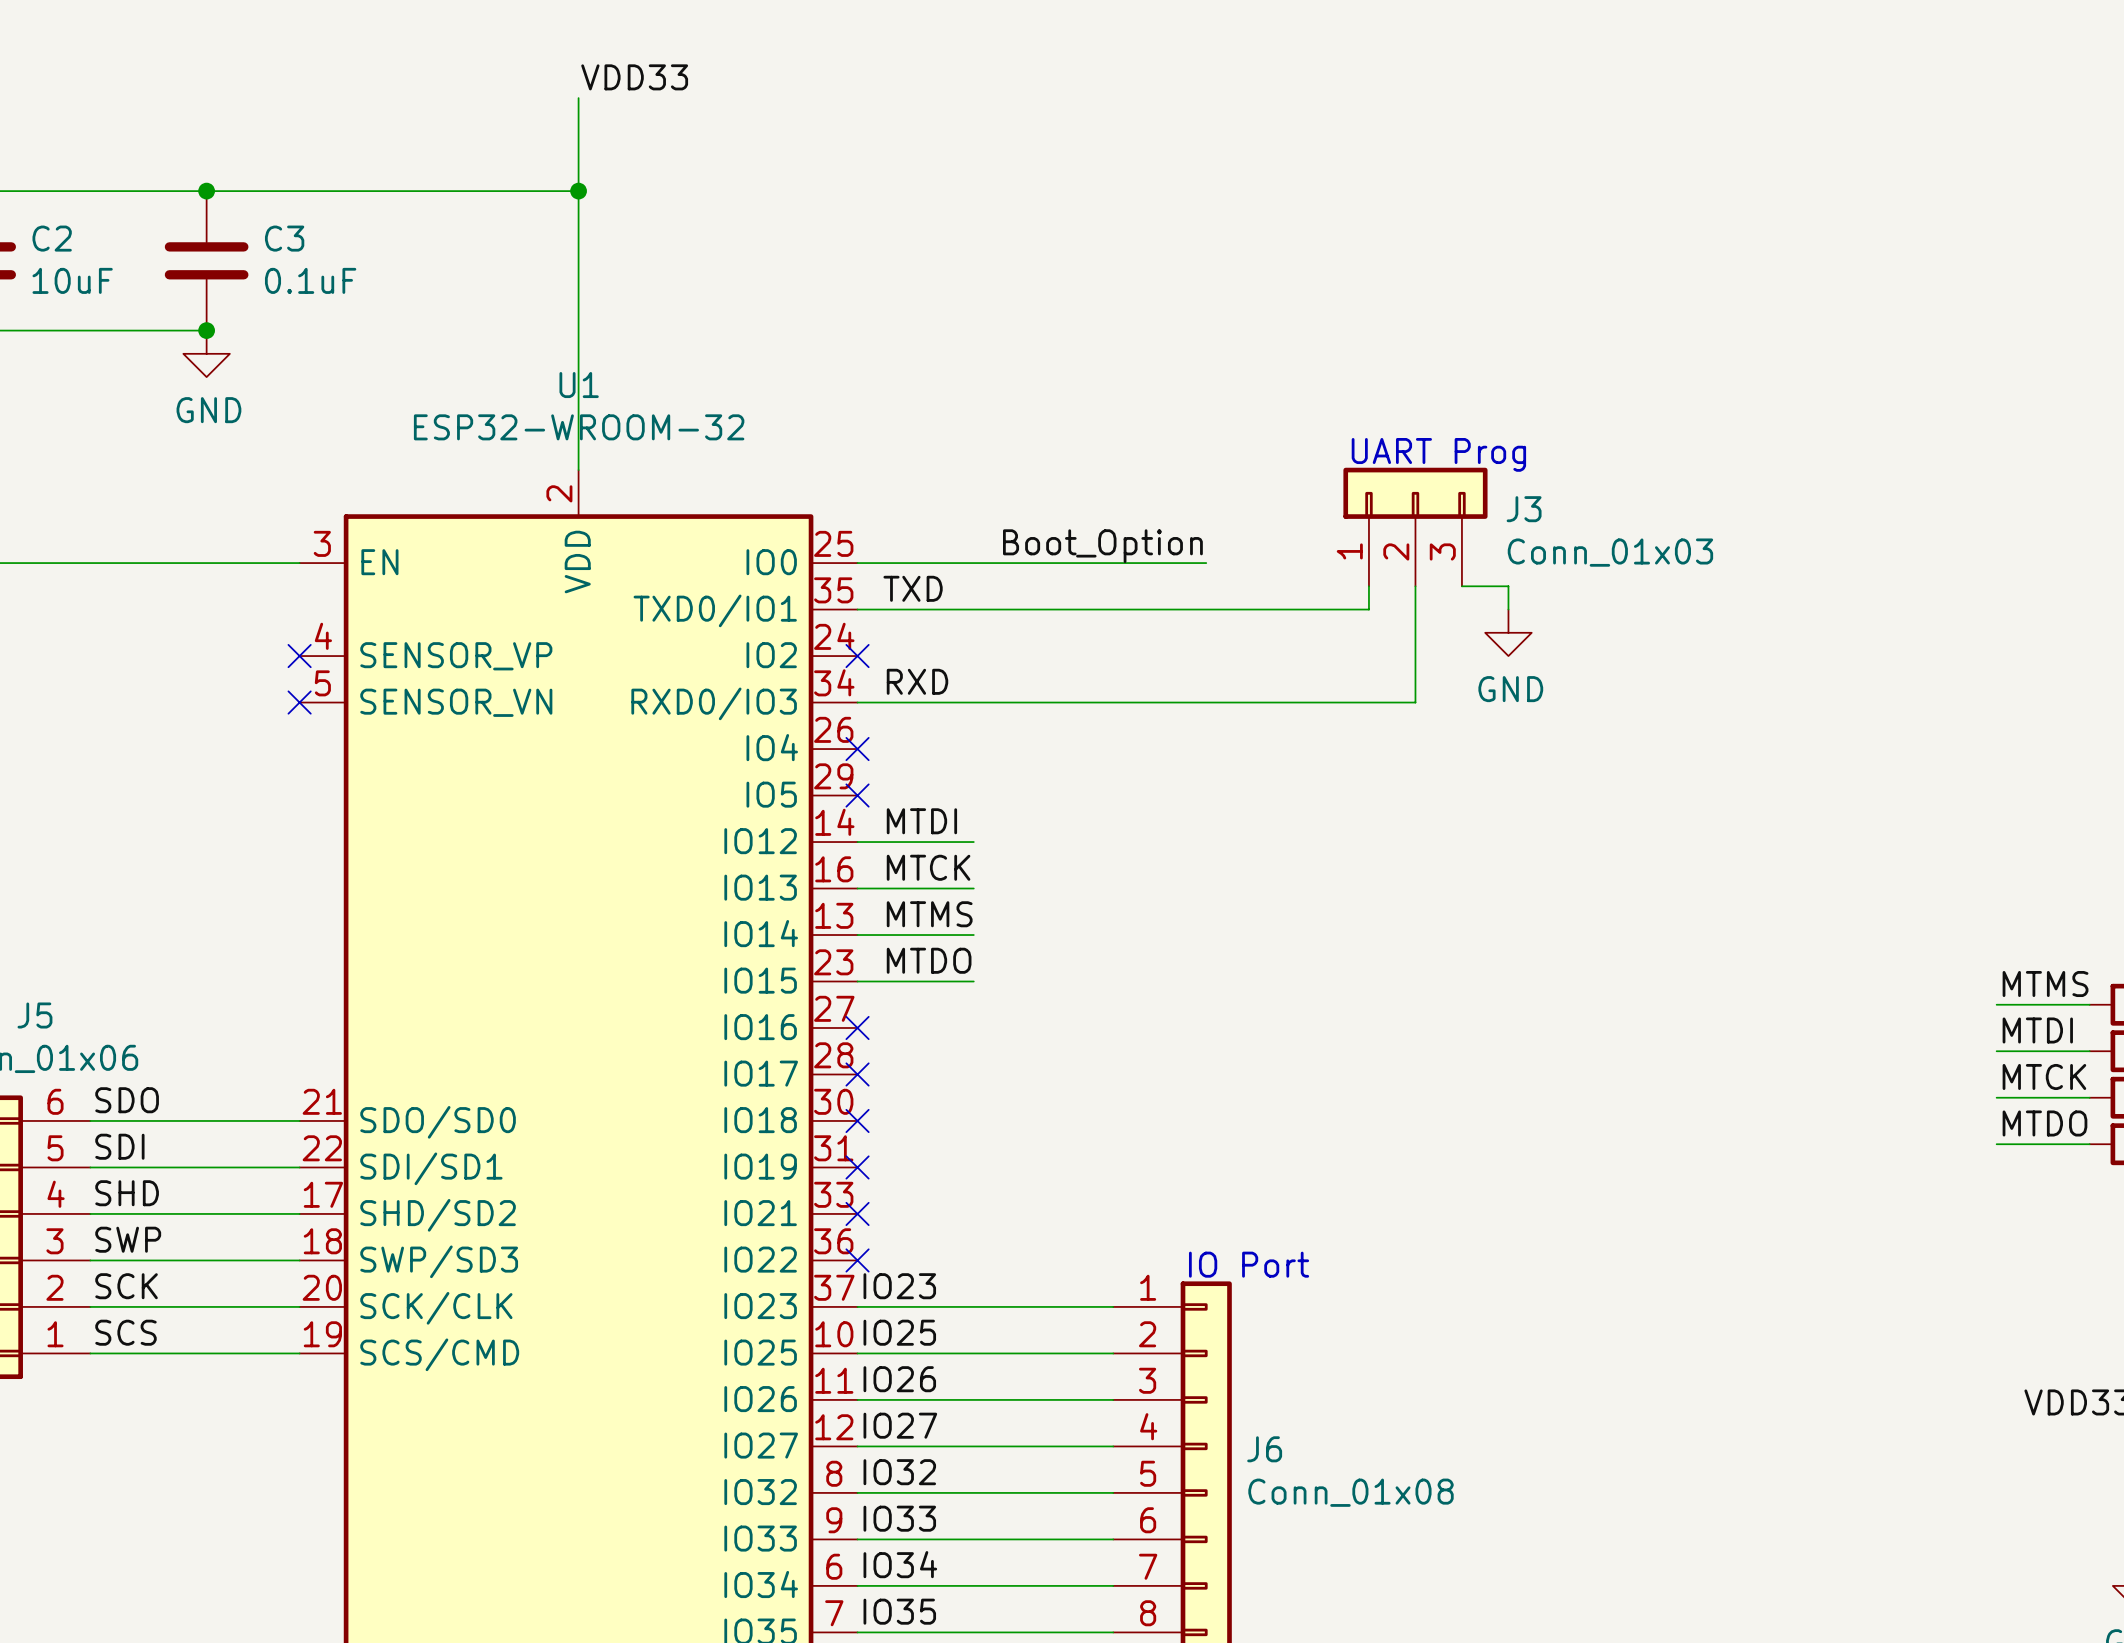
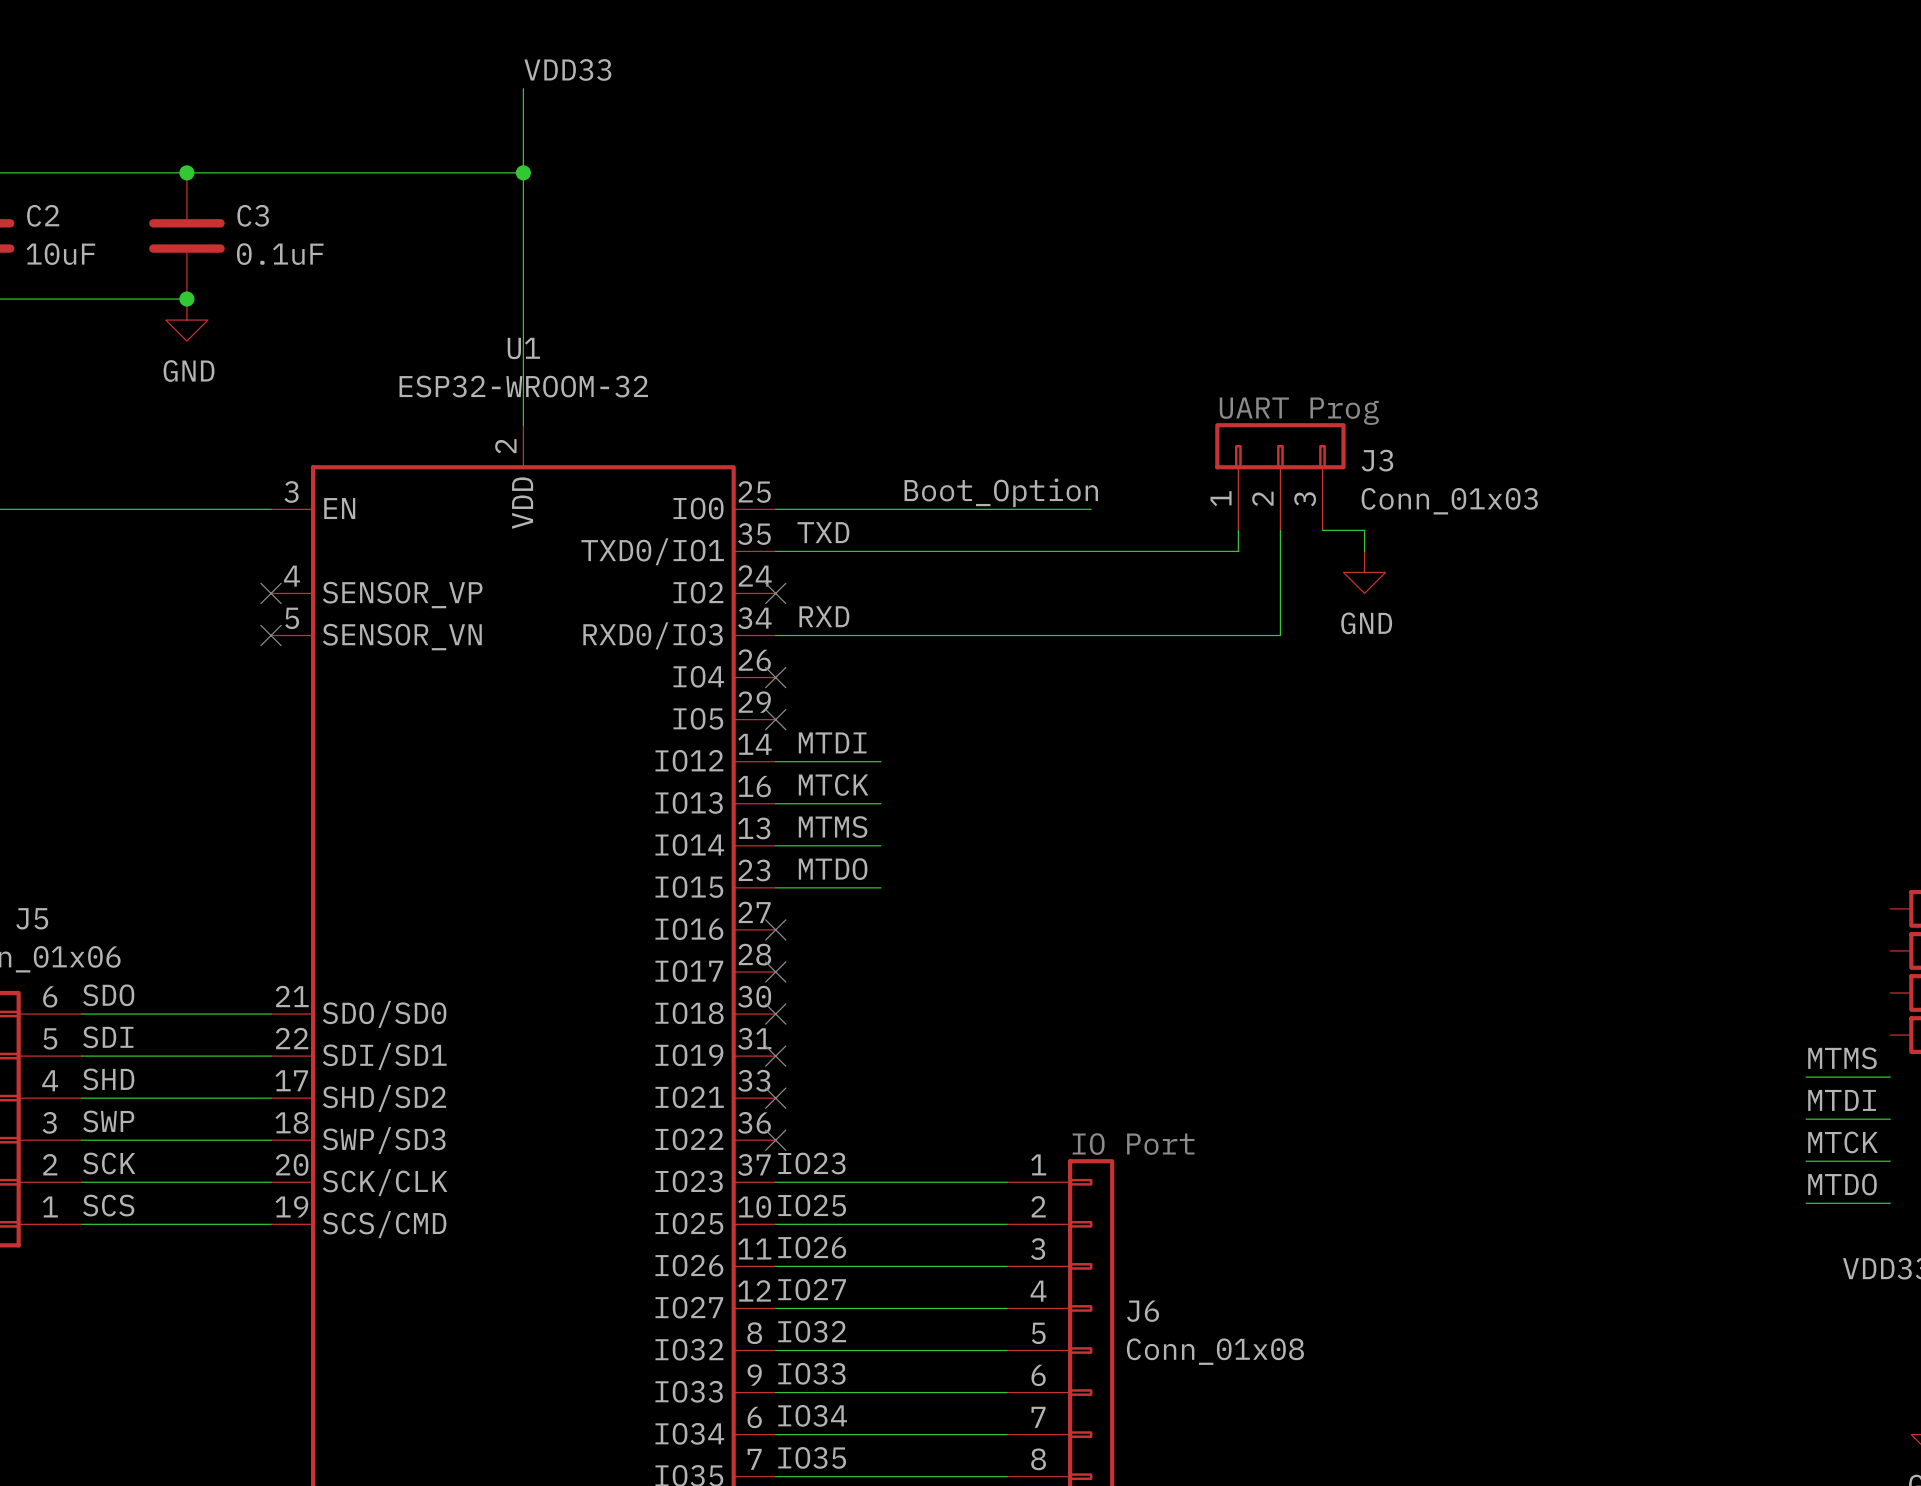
label position: MTMS (2045, 984) -> MTMS (1842, 1058)
wire: (1996, 1004) (2089, 1004) -> (1806, 1077) (1890, 1077)
label position: MTDI (2037, 1030) -> MTDI (1842, 1100)
wire: (1996, 1051) (2089, 1051) -> (1806, 1119) (1890, 1119)
label position: MTCK (2044, 1076) -> MTCK (1843, 1142)
wire: (1996, 1097) (2089, 1097) -> (1806, 1161) (1890, 1161)
label position: MTDO (2044, 1123) -> MTDO (1842, 1184)
wire: (1996, 1144) (2089, 1144) -> (1806, 1203) (1890, 1203)

